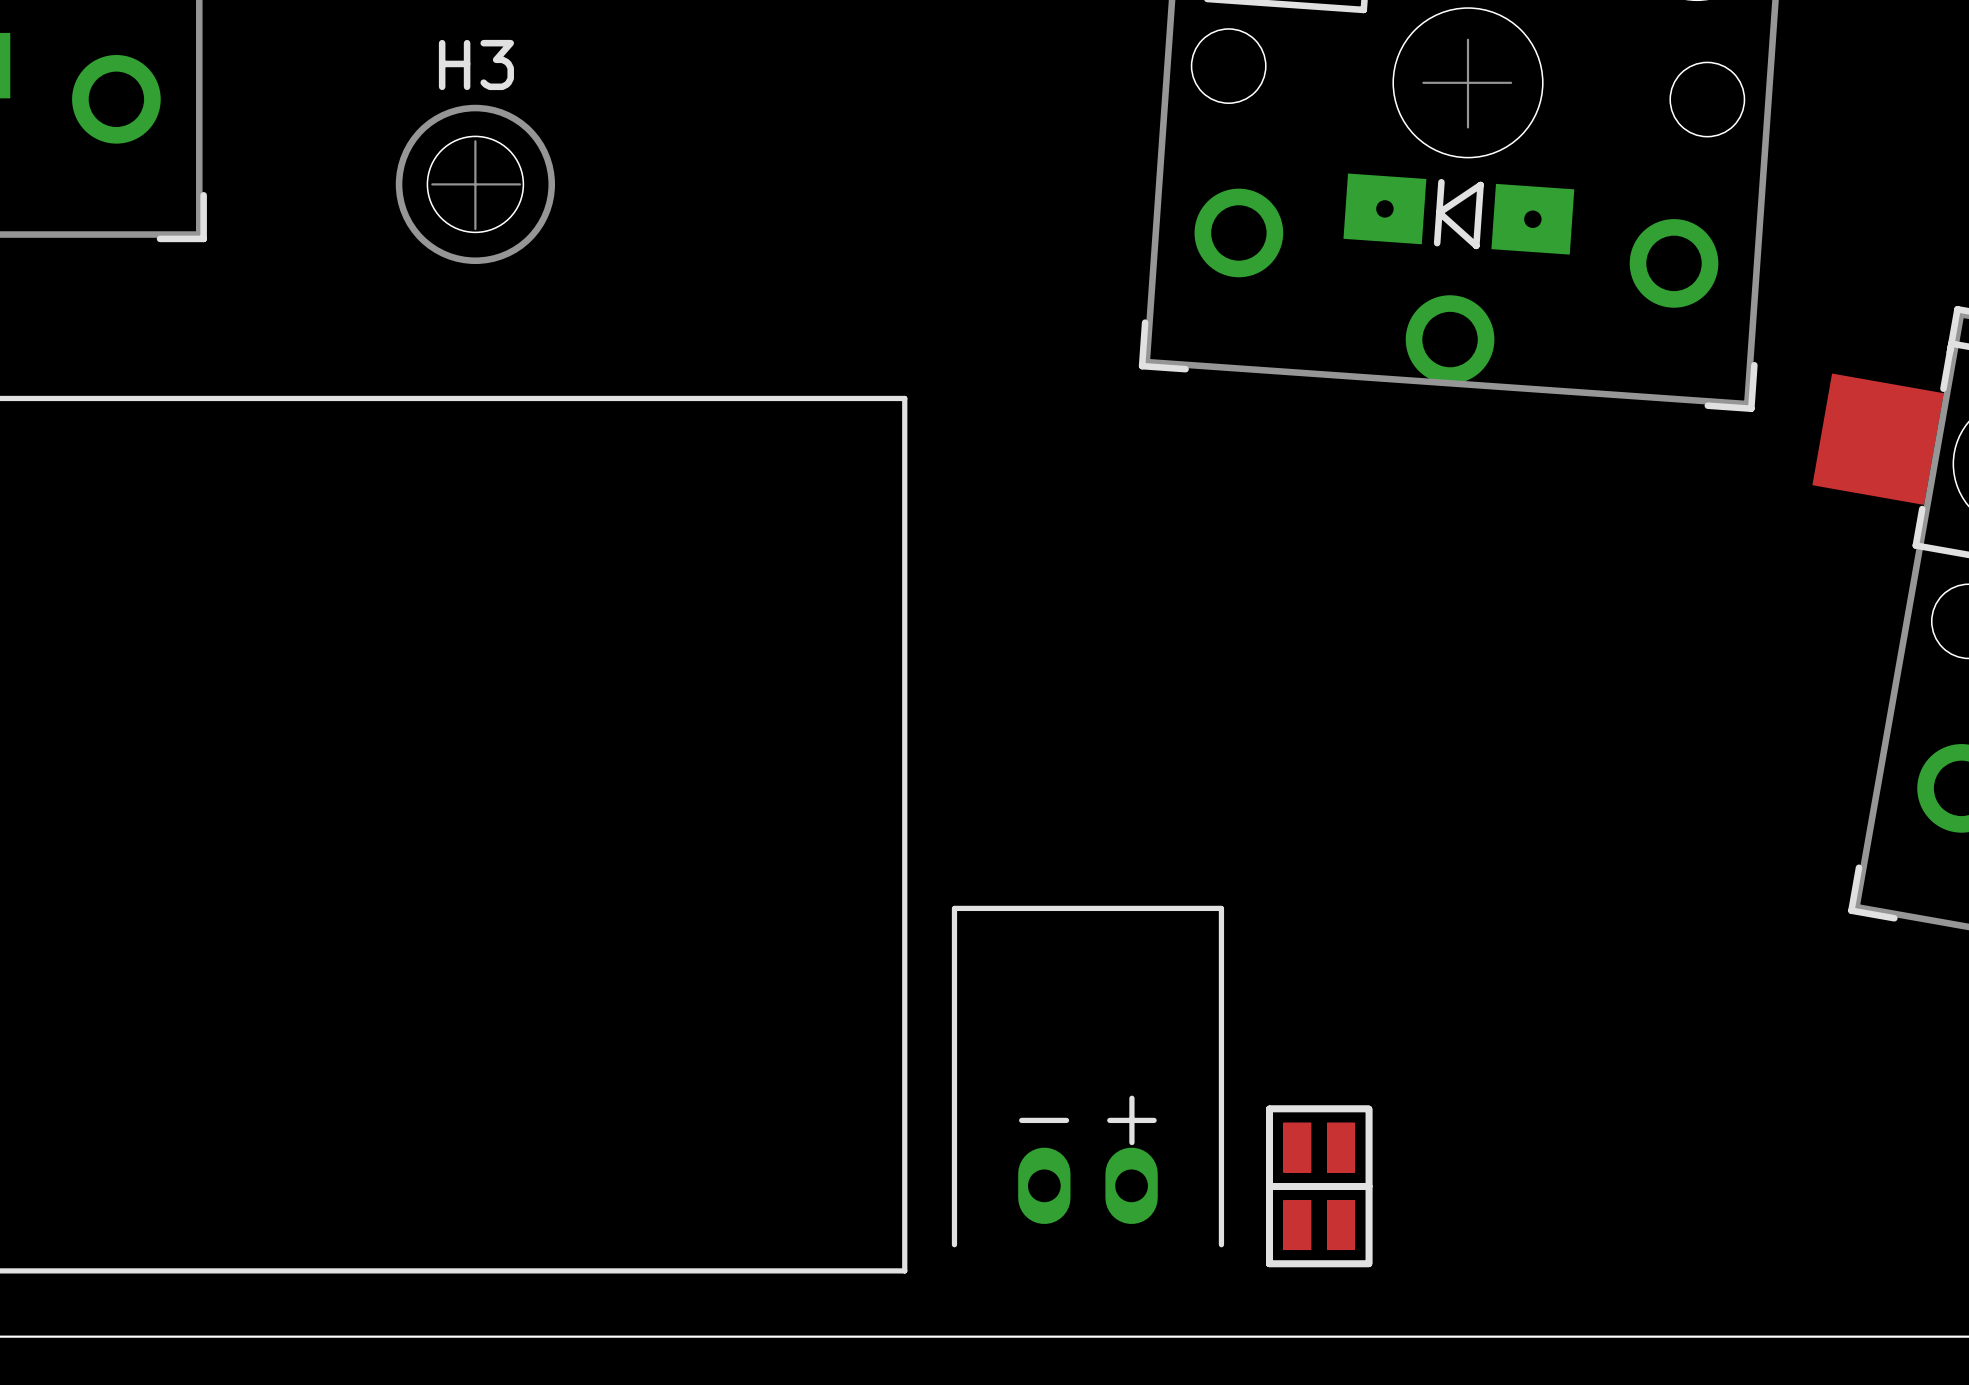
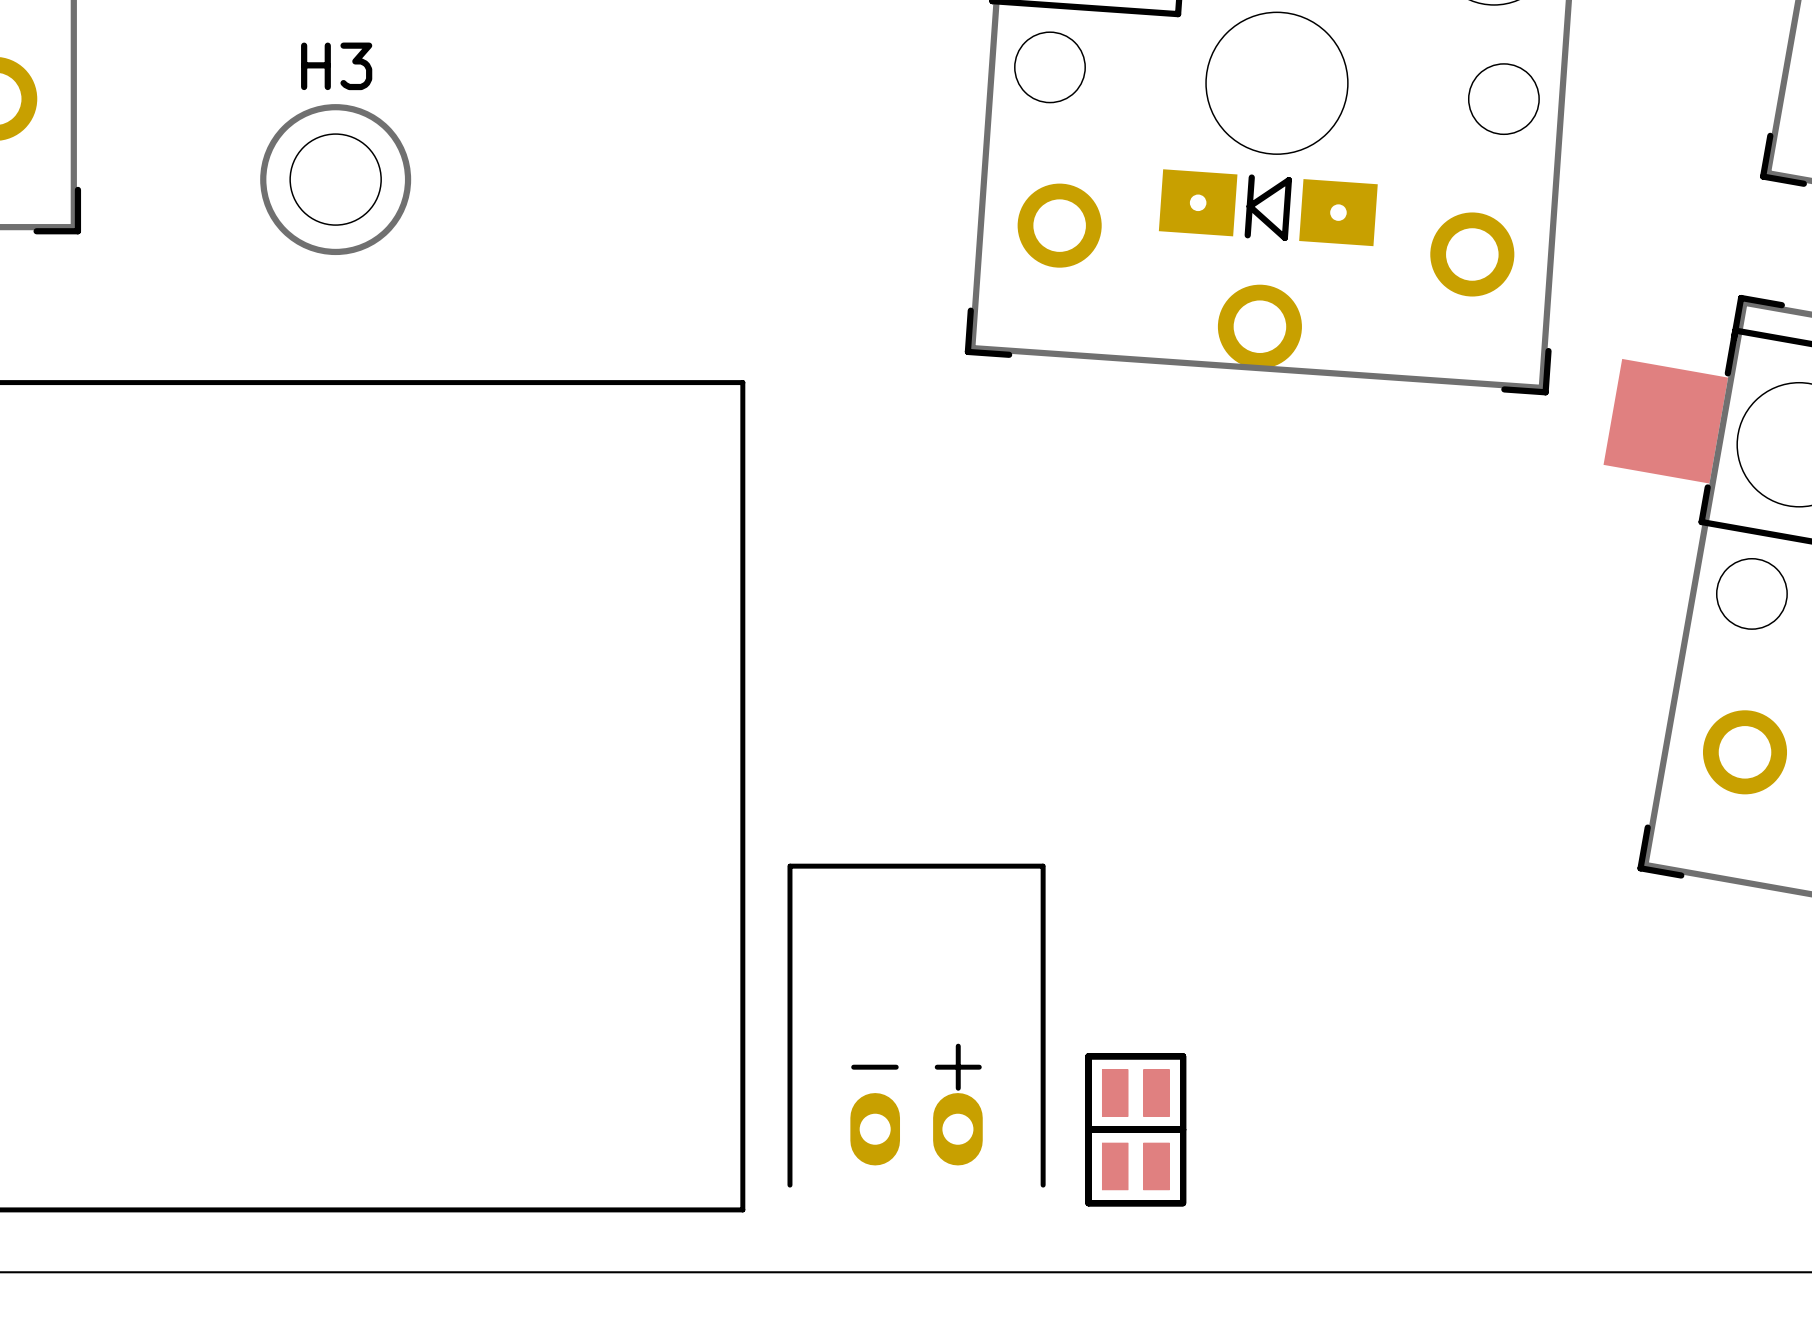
line: (1468, 39) (1468, 127) -> none
line: (1423, 82) (1511, 82) -> none
line: (475, 141) (475, 229) -> none
line: (432, 184) (520, 184) -> none

